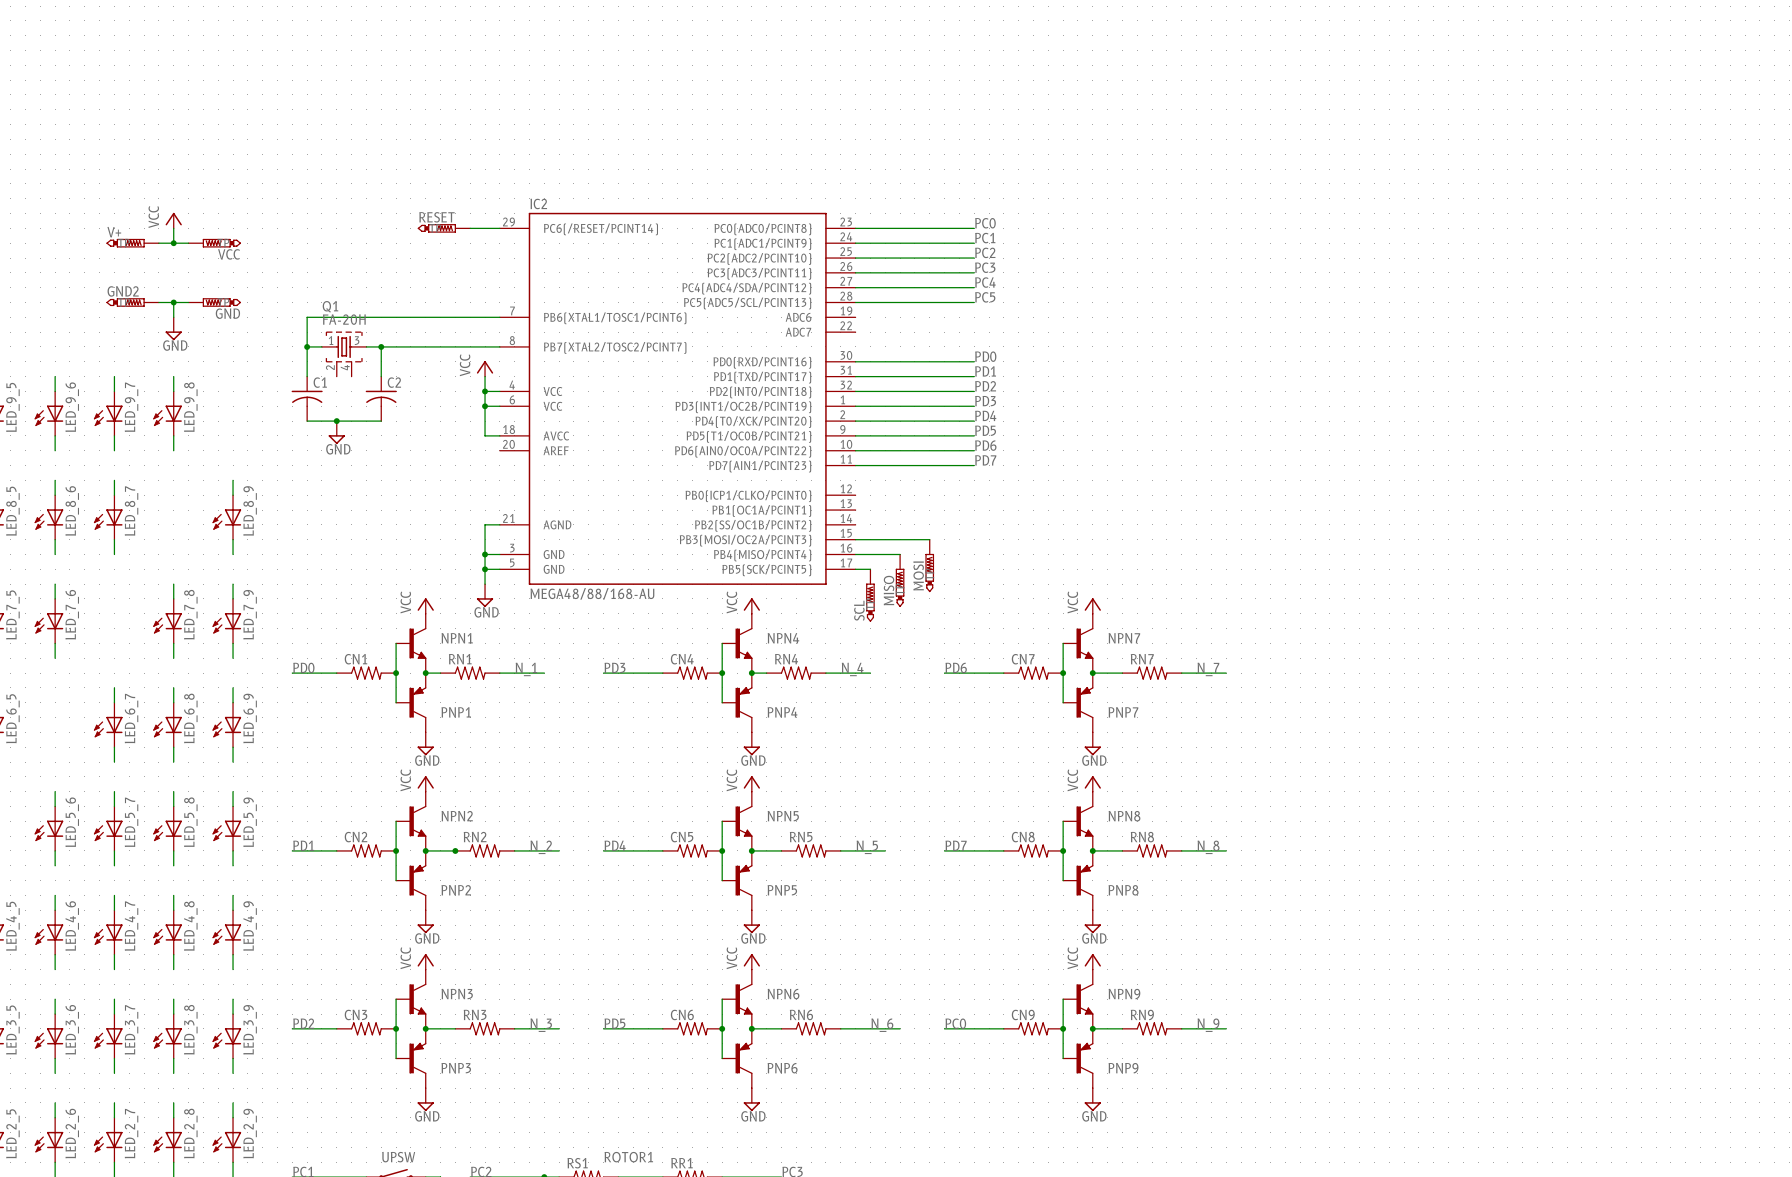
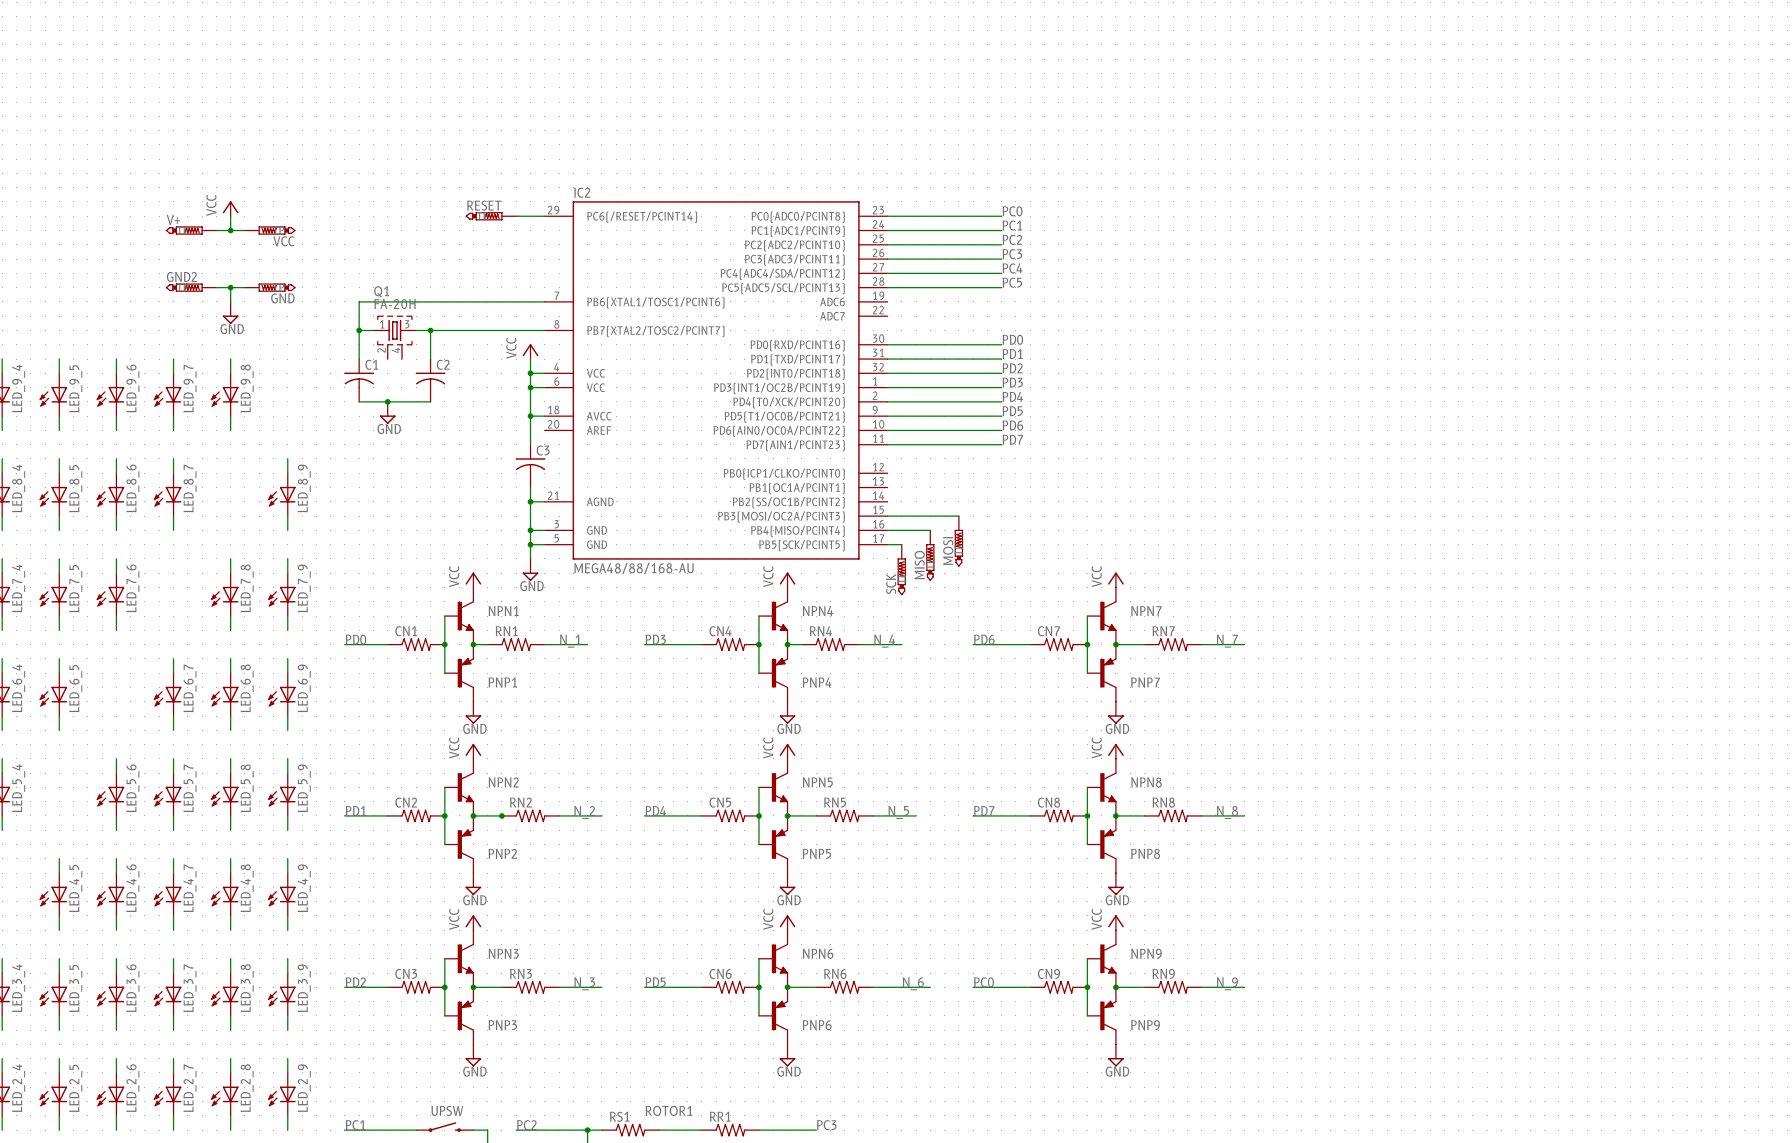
wire: none -> (530, 416) (530, 444)
junction: none -> (530, 416)
C3: none -> (530, 466)
wire: none -> (530, 487) (530, 501)
junction: none -> (530, 501)
SCL name: SCL (859, 610) -> SCK (891, 584)

